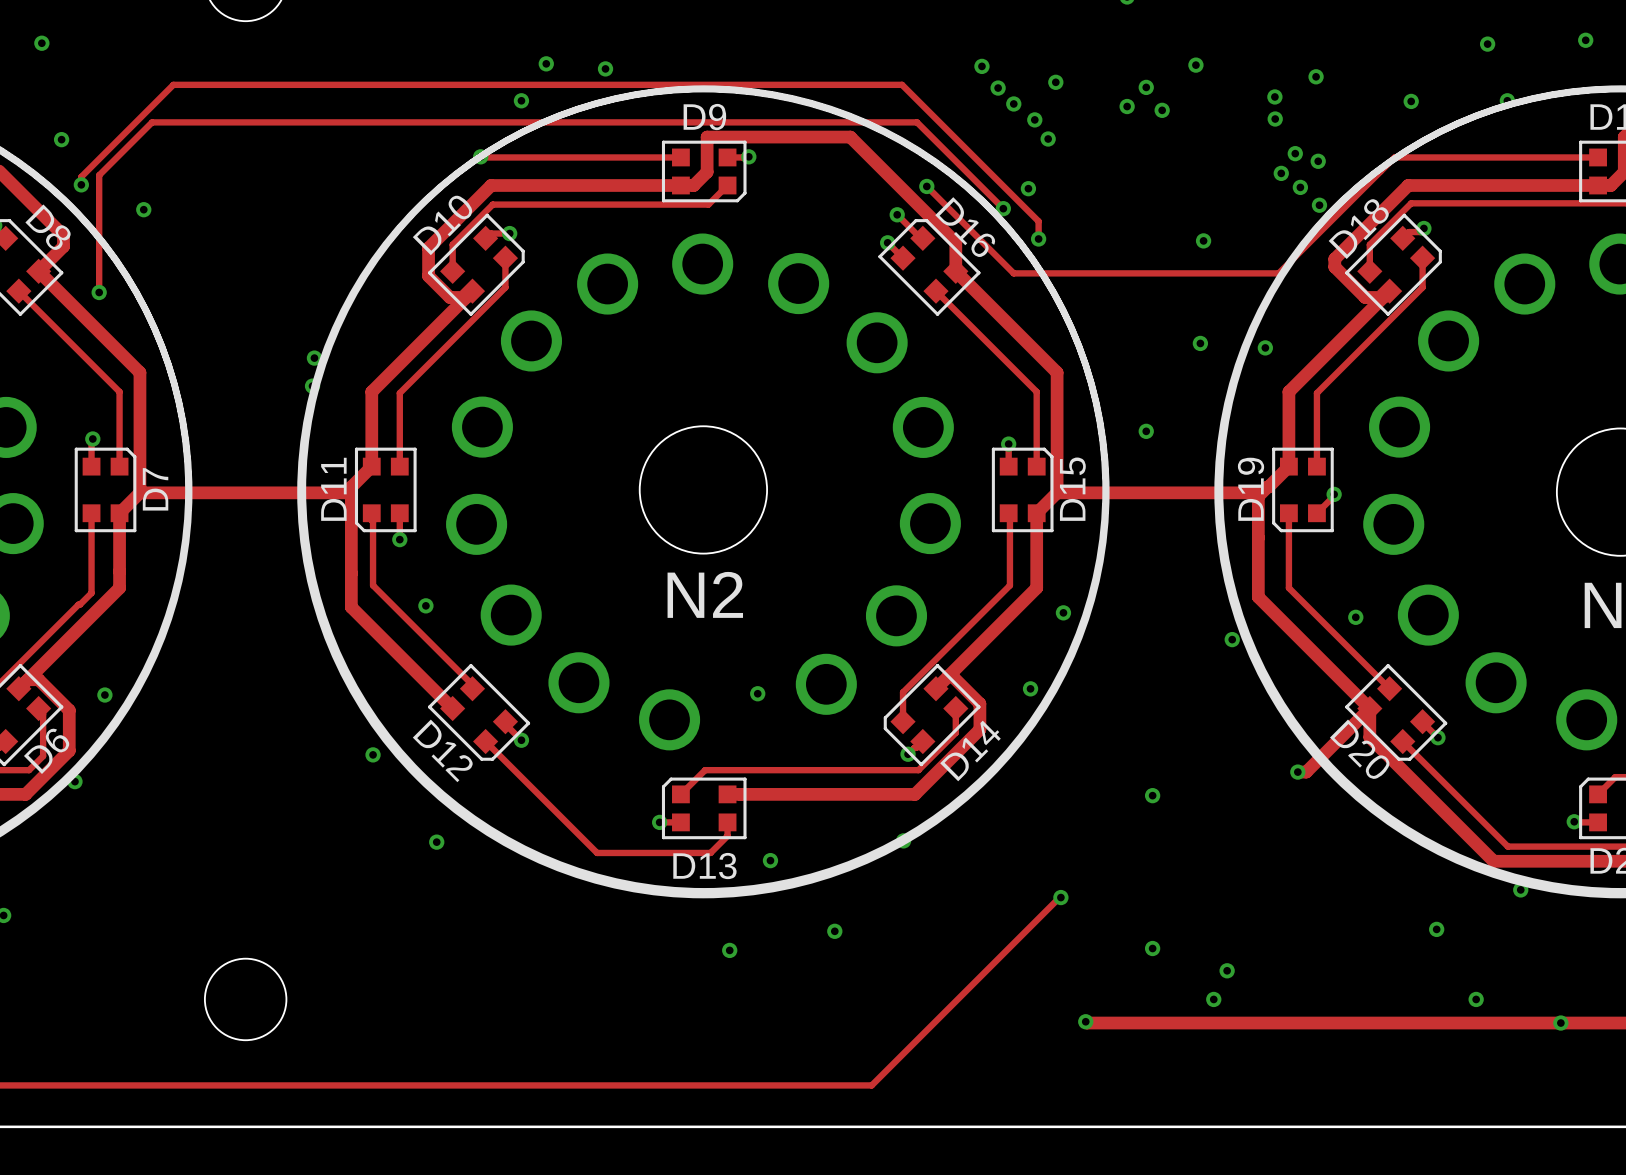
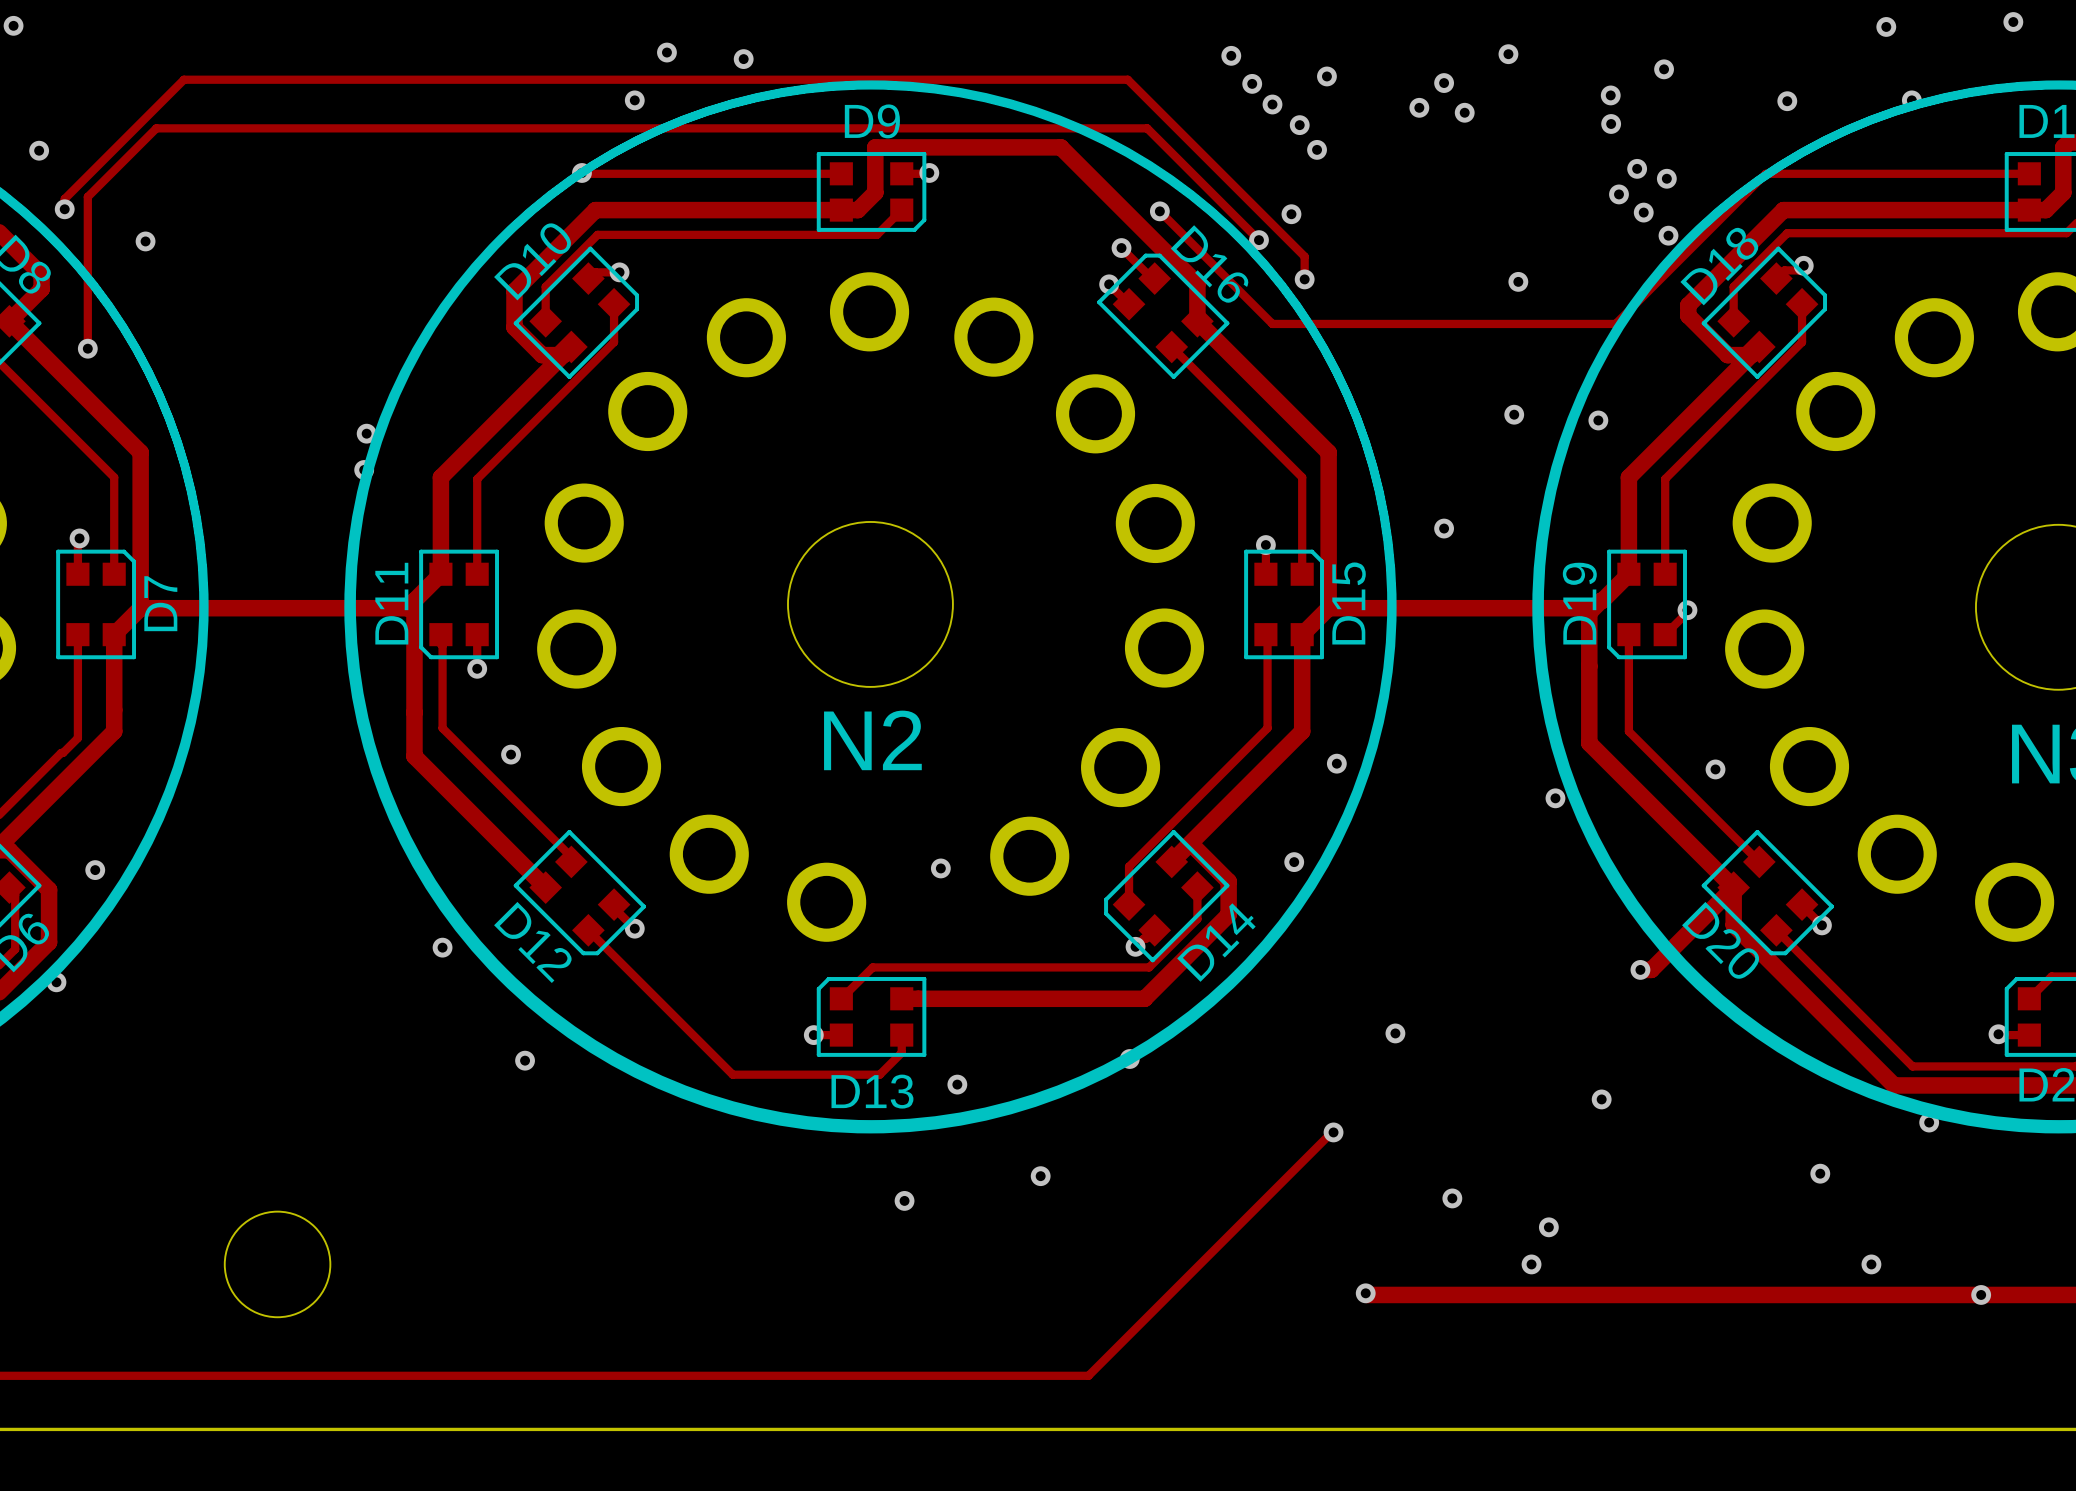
via position: (1152, 795) -> (1395, 1033)
via: none -> (1601, 1099)

